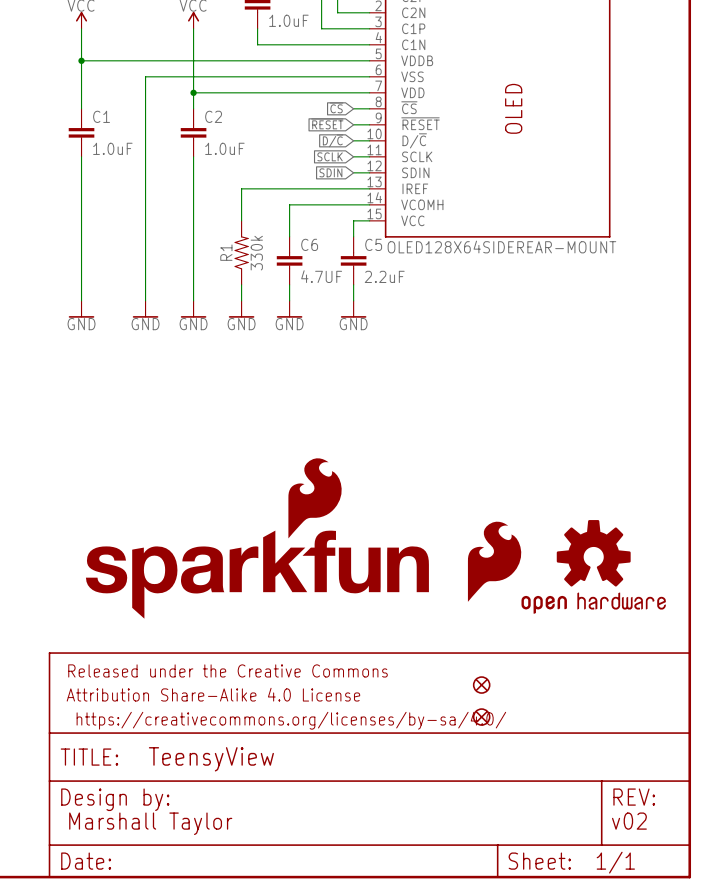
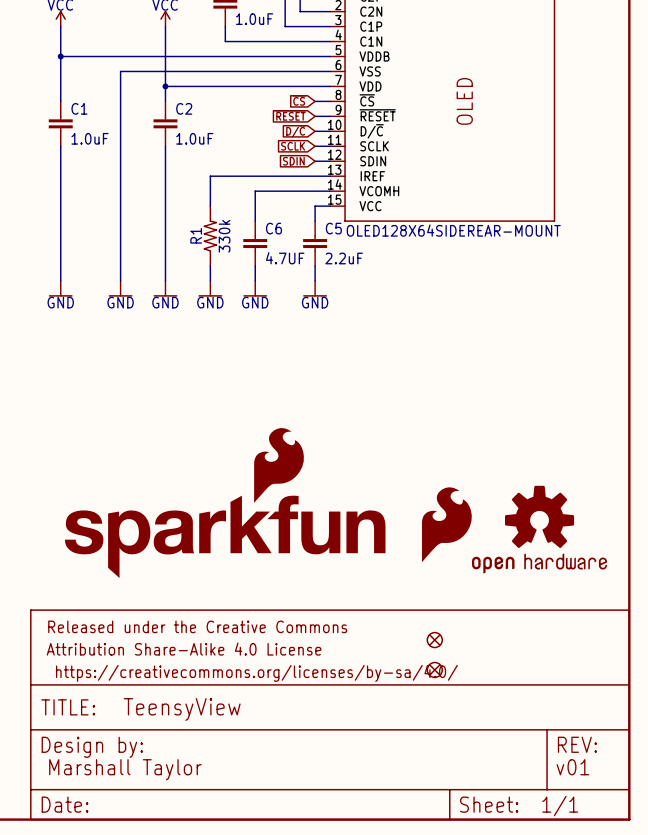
text: v02 (629, 821) -> v01 (572, 767)

